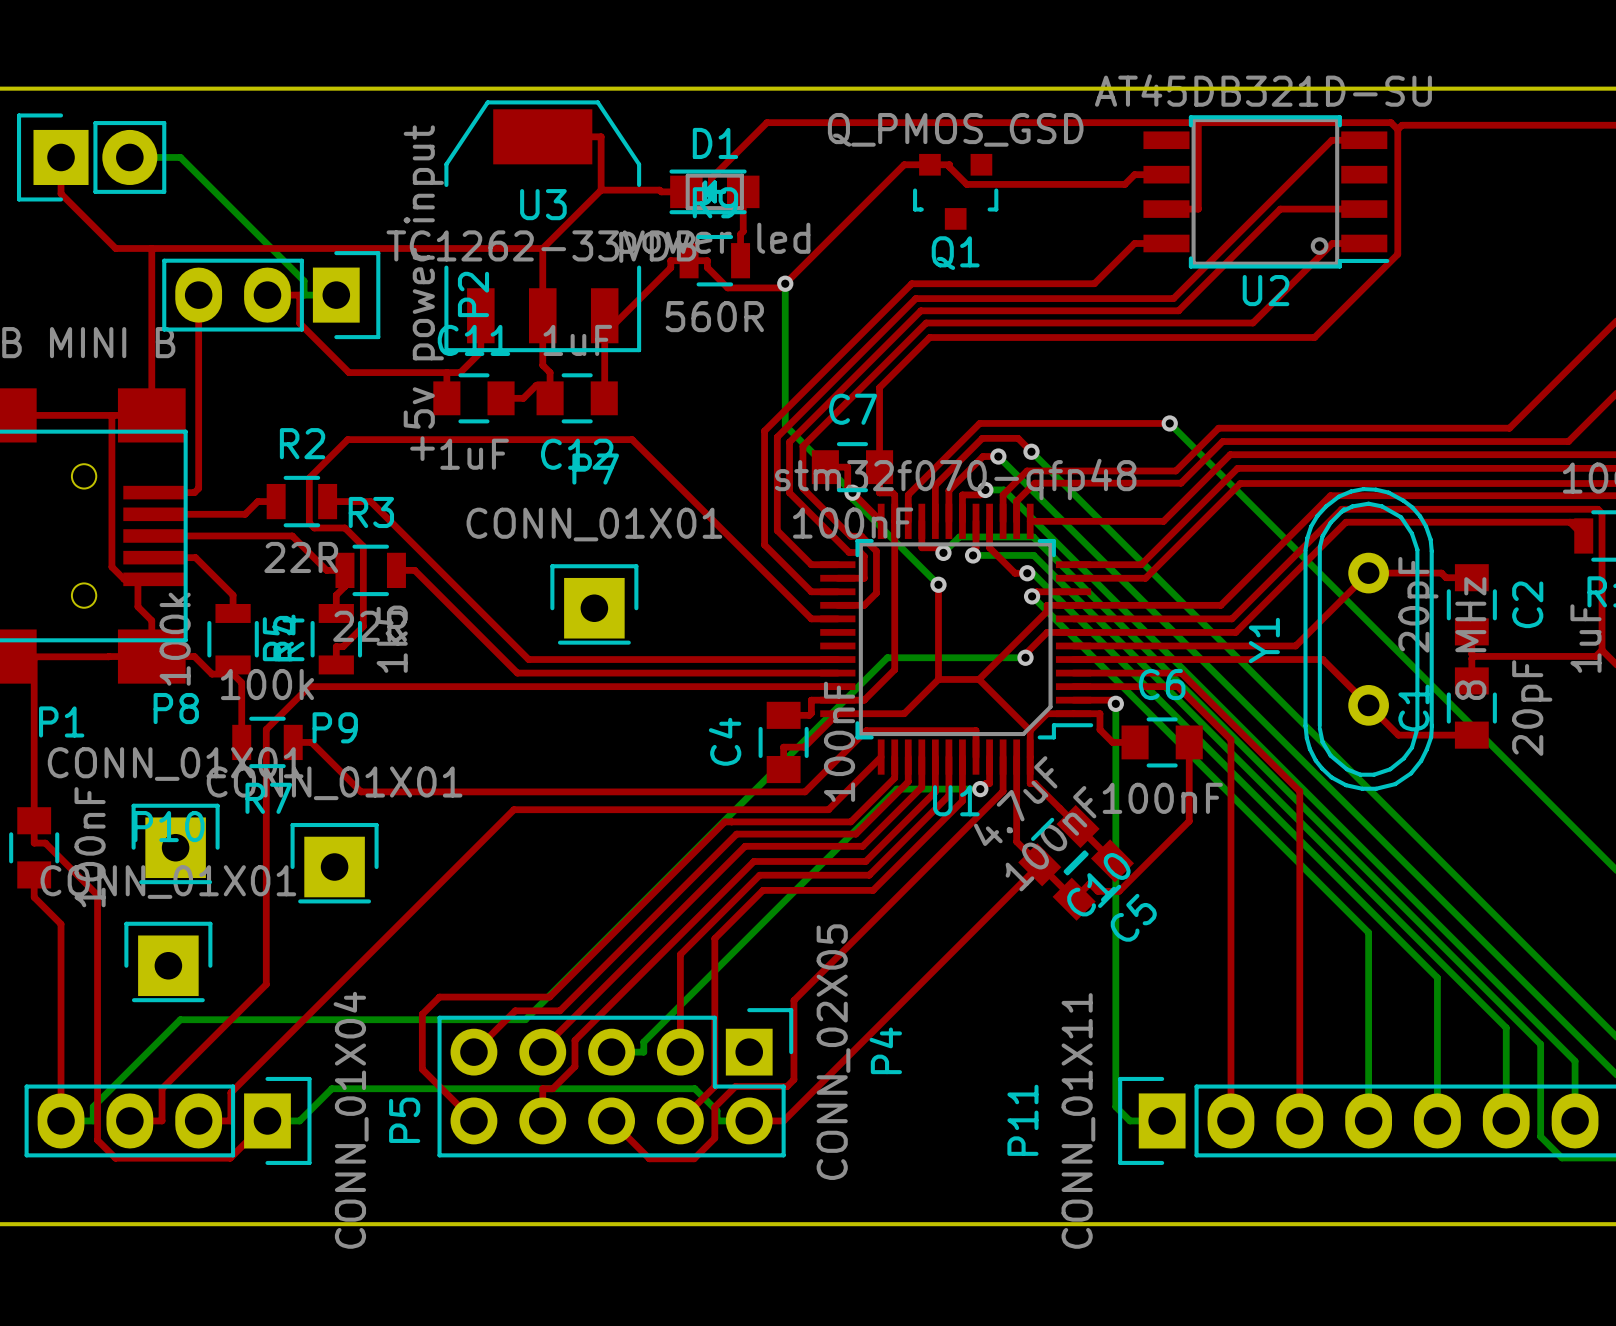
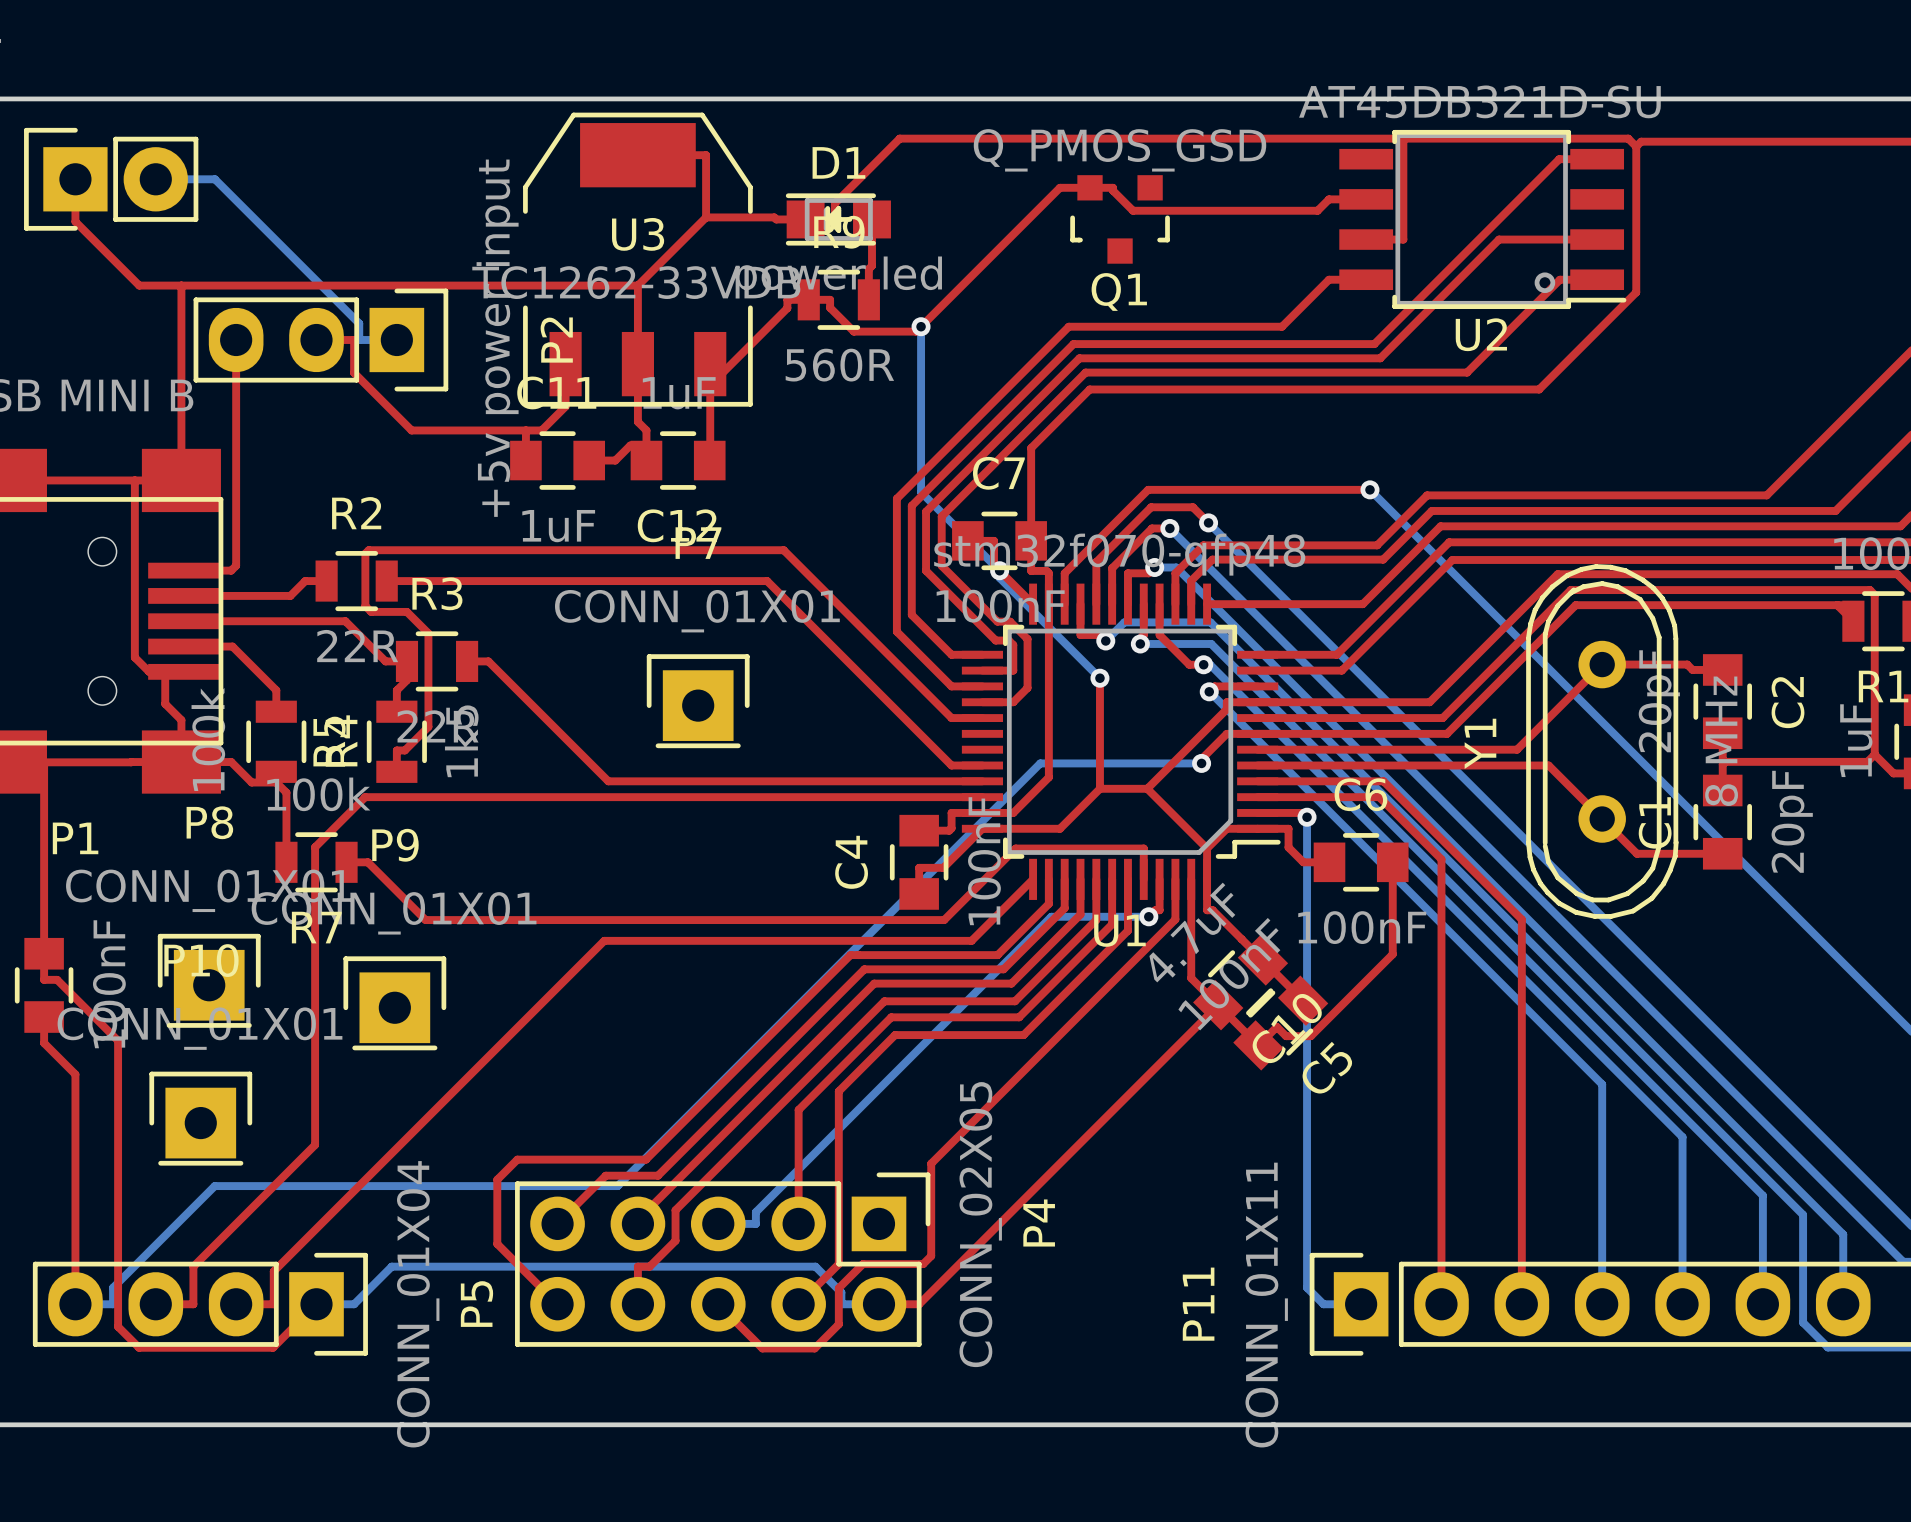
top track: (312, 475) (347, 439) (632, 439) (667, 475) -> (368, 550) (783, 550)
top track: (370, 501) (528, 659) (811, 659) -> (437, 581) (767, 581) (951, 765)

